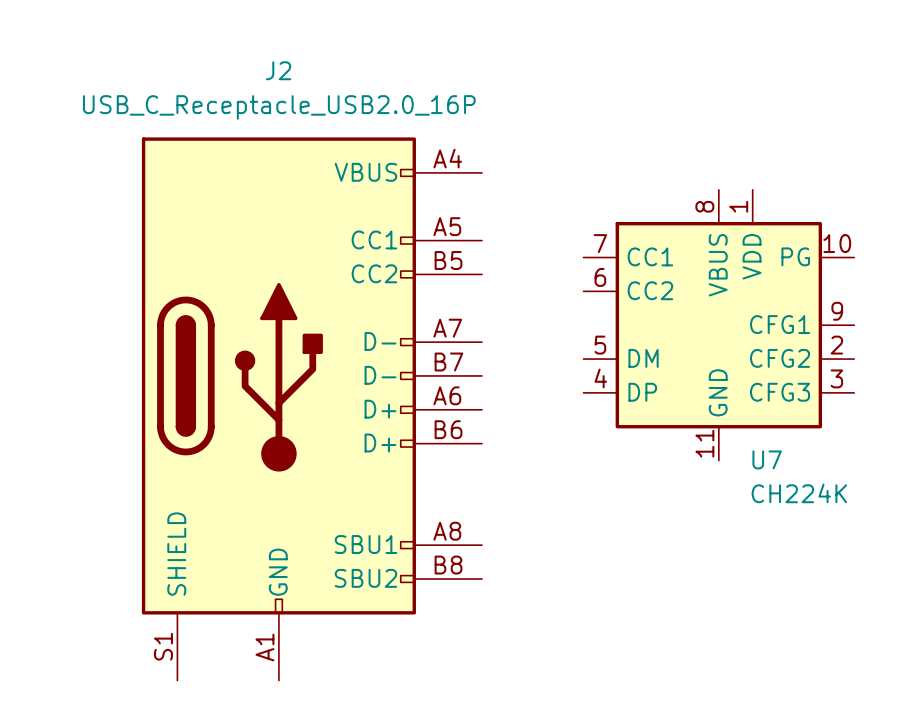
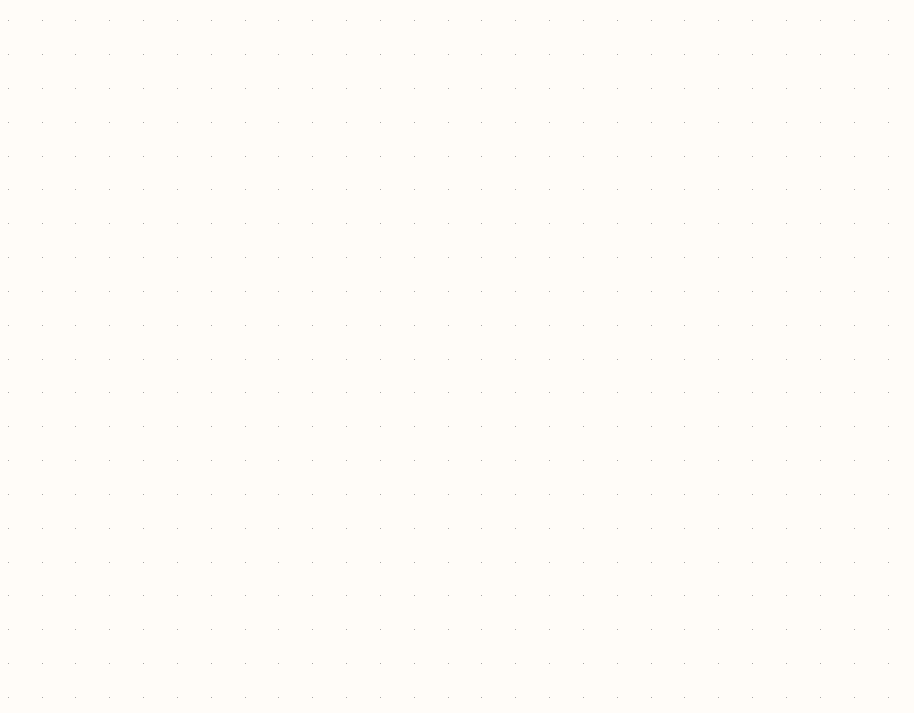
U7: CH224K (718, 325) -> none
J2: USB_C_Receptacle_USB2.0_16P (311, 408) -> none

